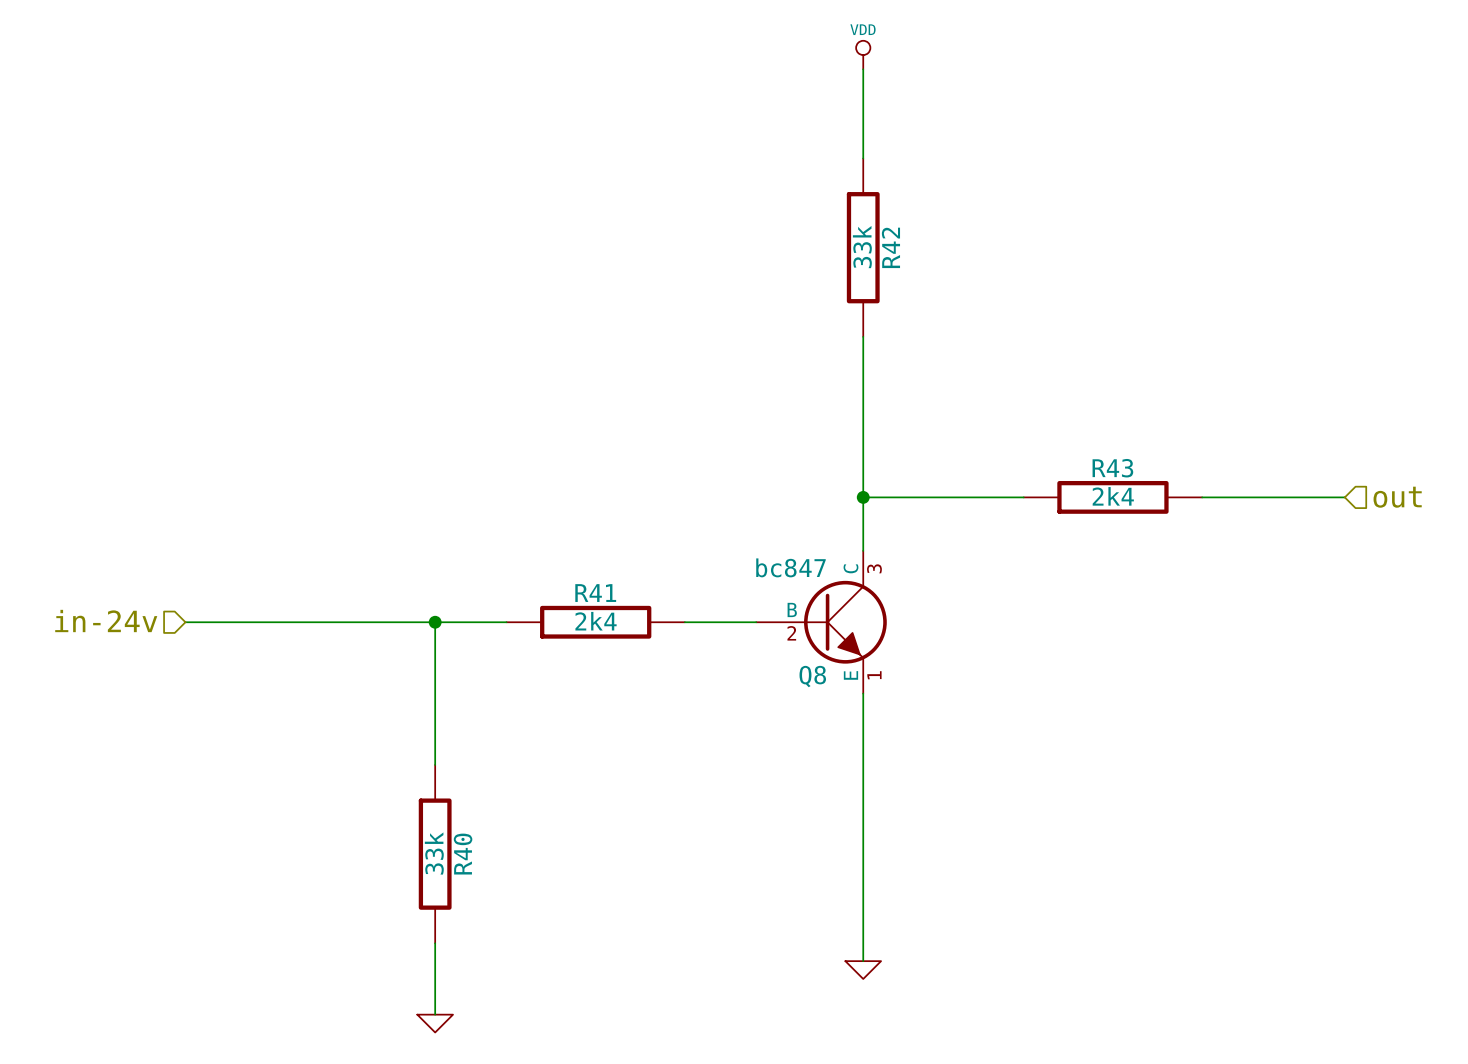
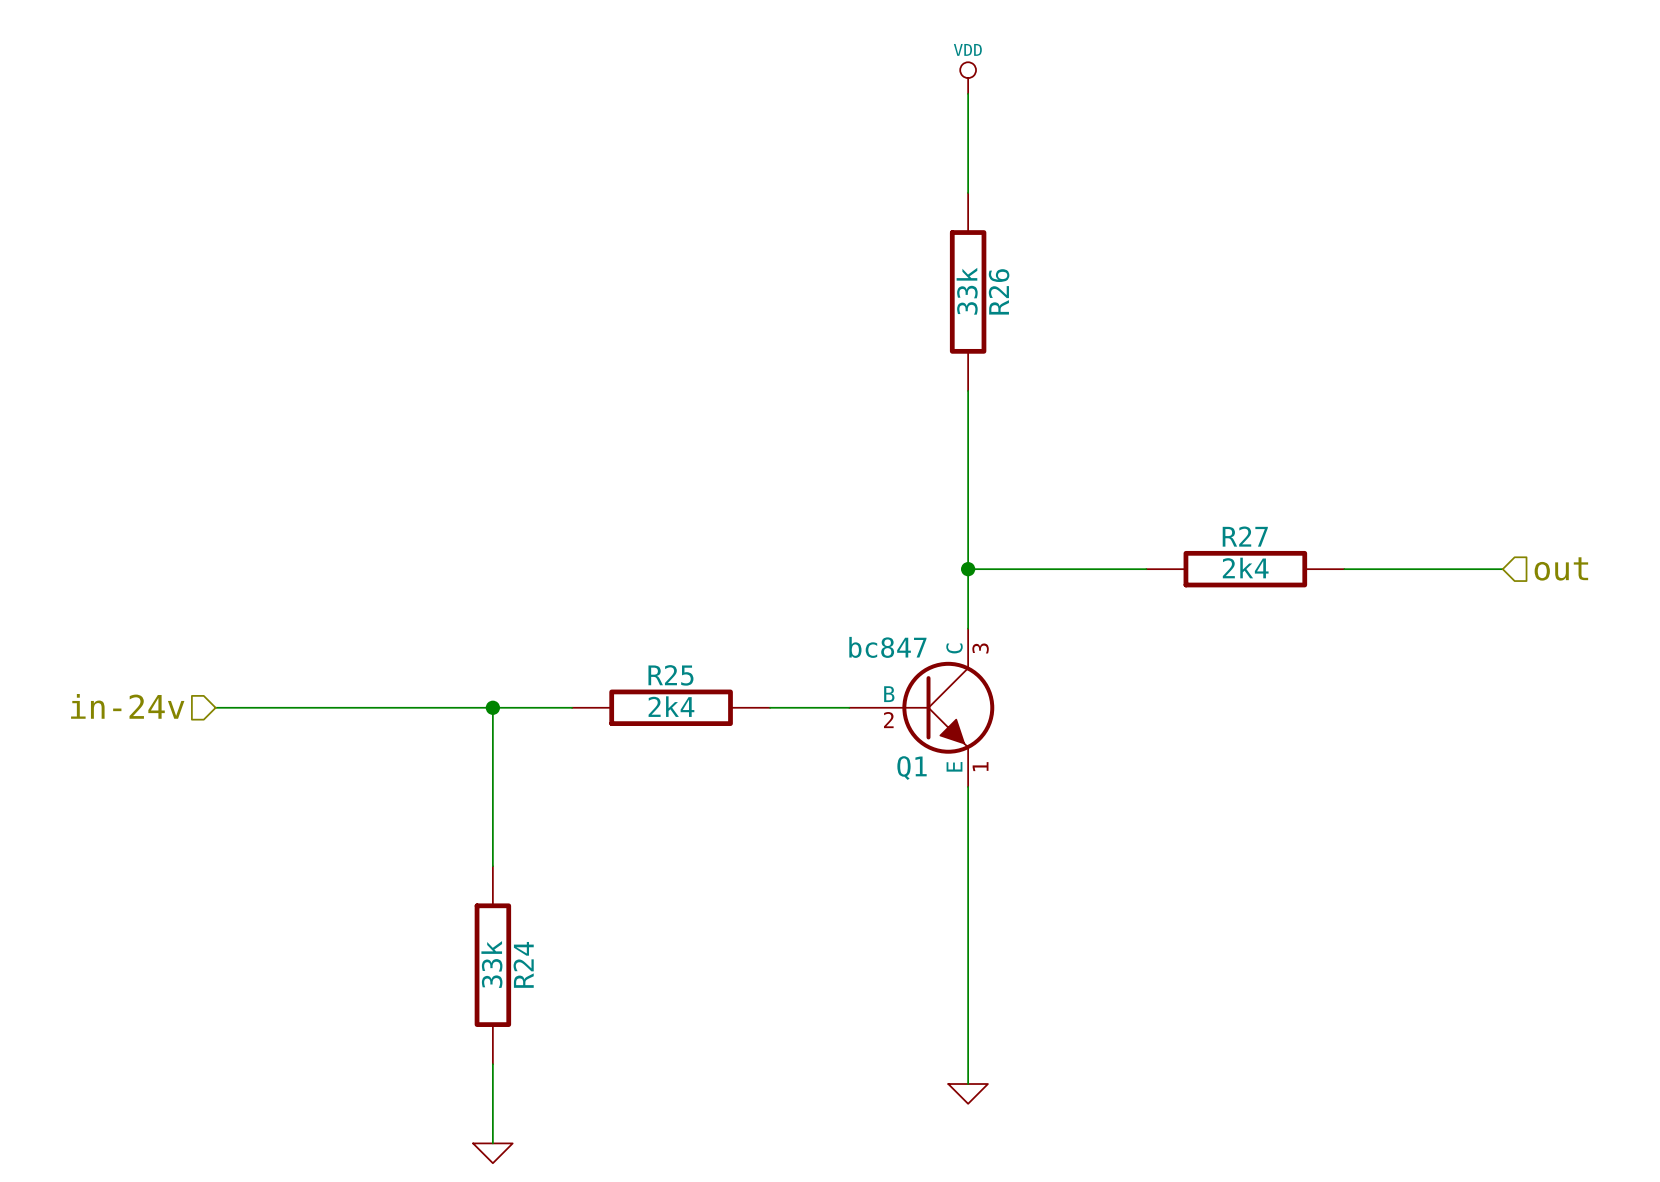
R42 name: R42 (890, 247) -> R26 (999, 291)
R43 name: R43 (1112, 468) -> R27 (1245, 536)
R41 name: R41 (595, 593) -> R25 (670, 675)
Q8 name: Q8 (812, 676) -> Q1 (912, 768)
R40 name: R40 (463, 854) -> R24 (523, 964)

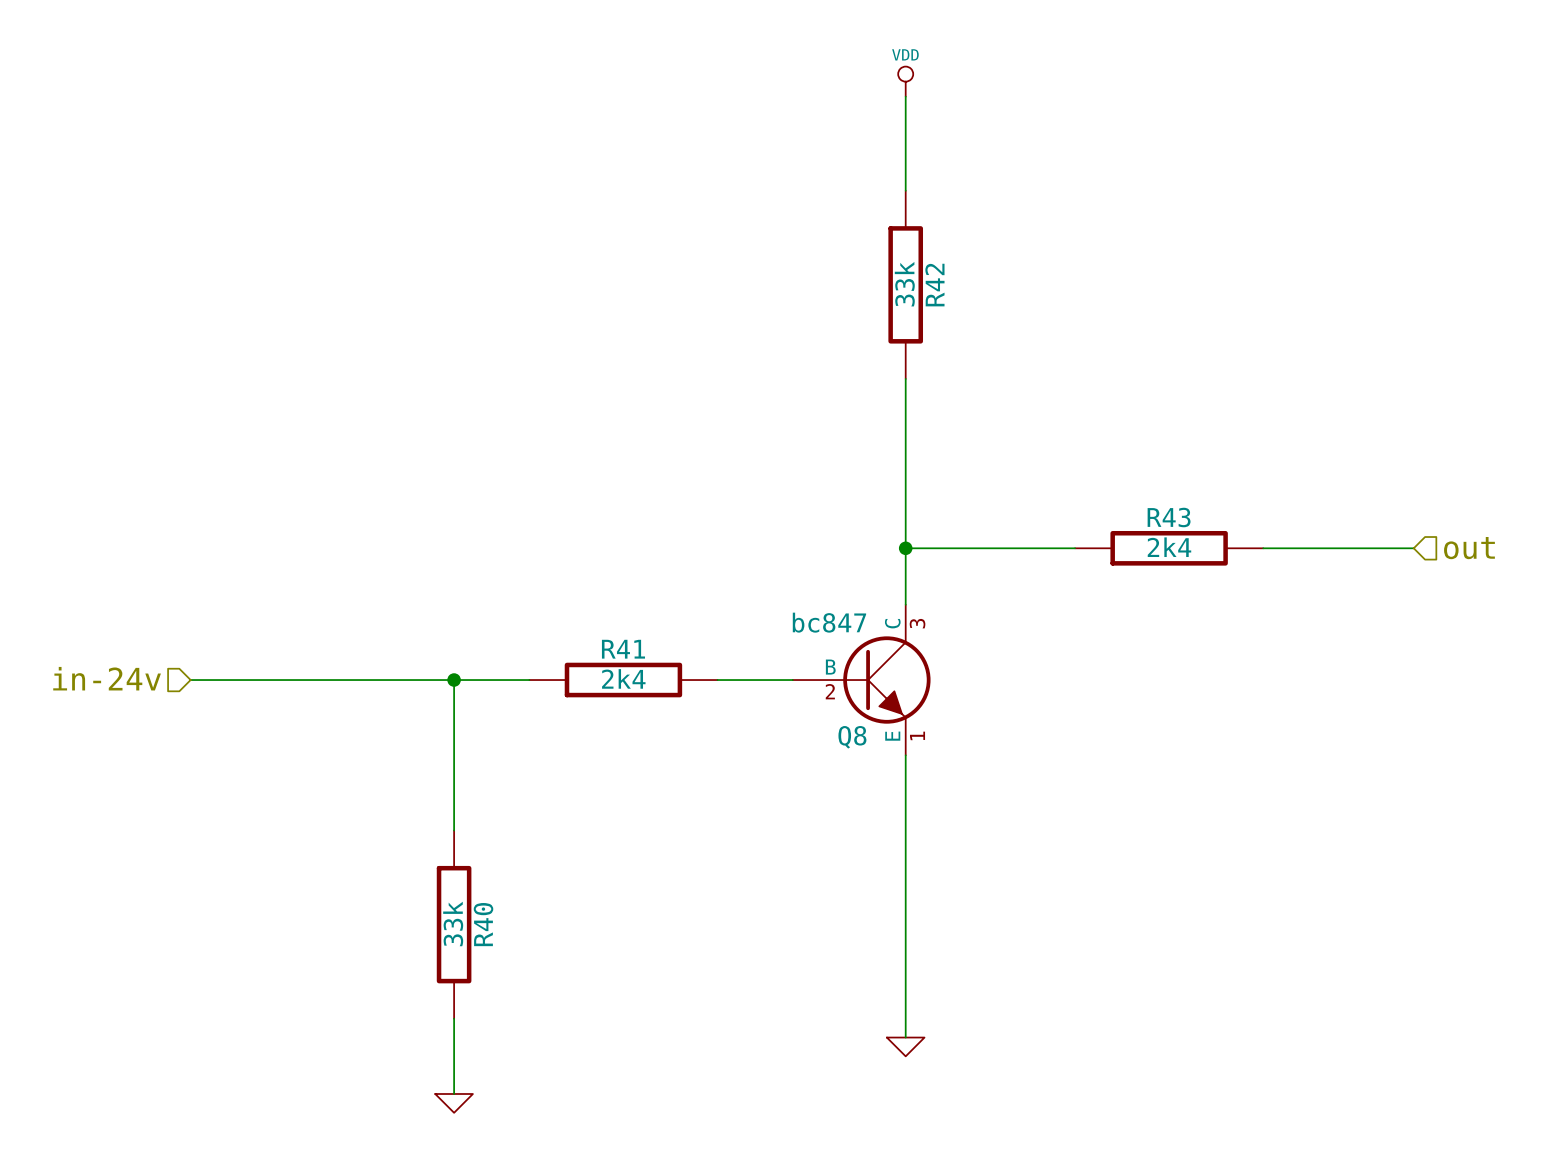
R26 name: R26 (999, 291) -> R42 (934, 285)
R27 name: R27 (1245, 536) -> R43 (1169, 517)
R25 name: R25 (670, 675) -> R41 (623, 649)
Q1 name: Q1 (912, 768) -> Q8 (852, 737)
R24 name: R24 (523, 964) -> R40 (483, 924)

